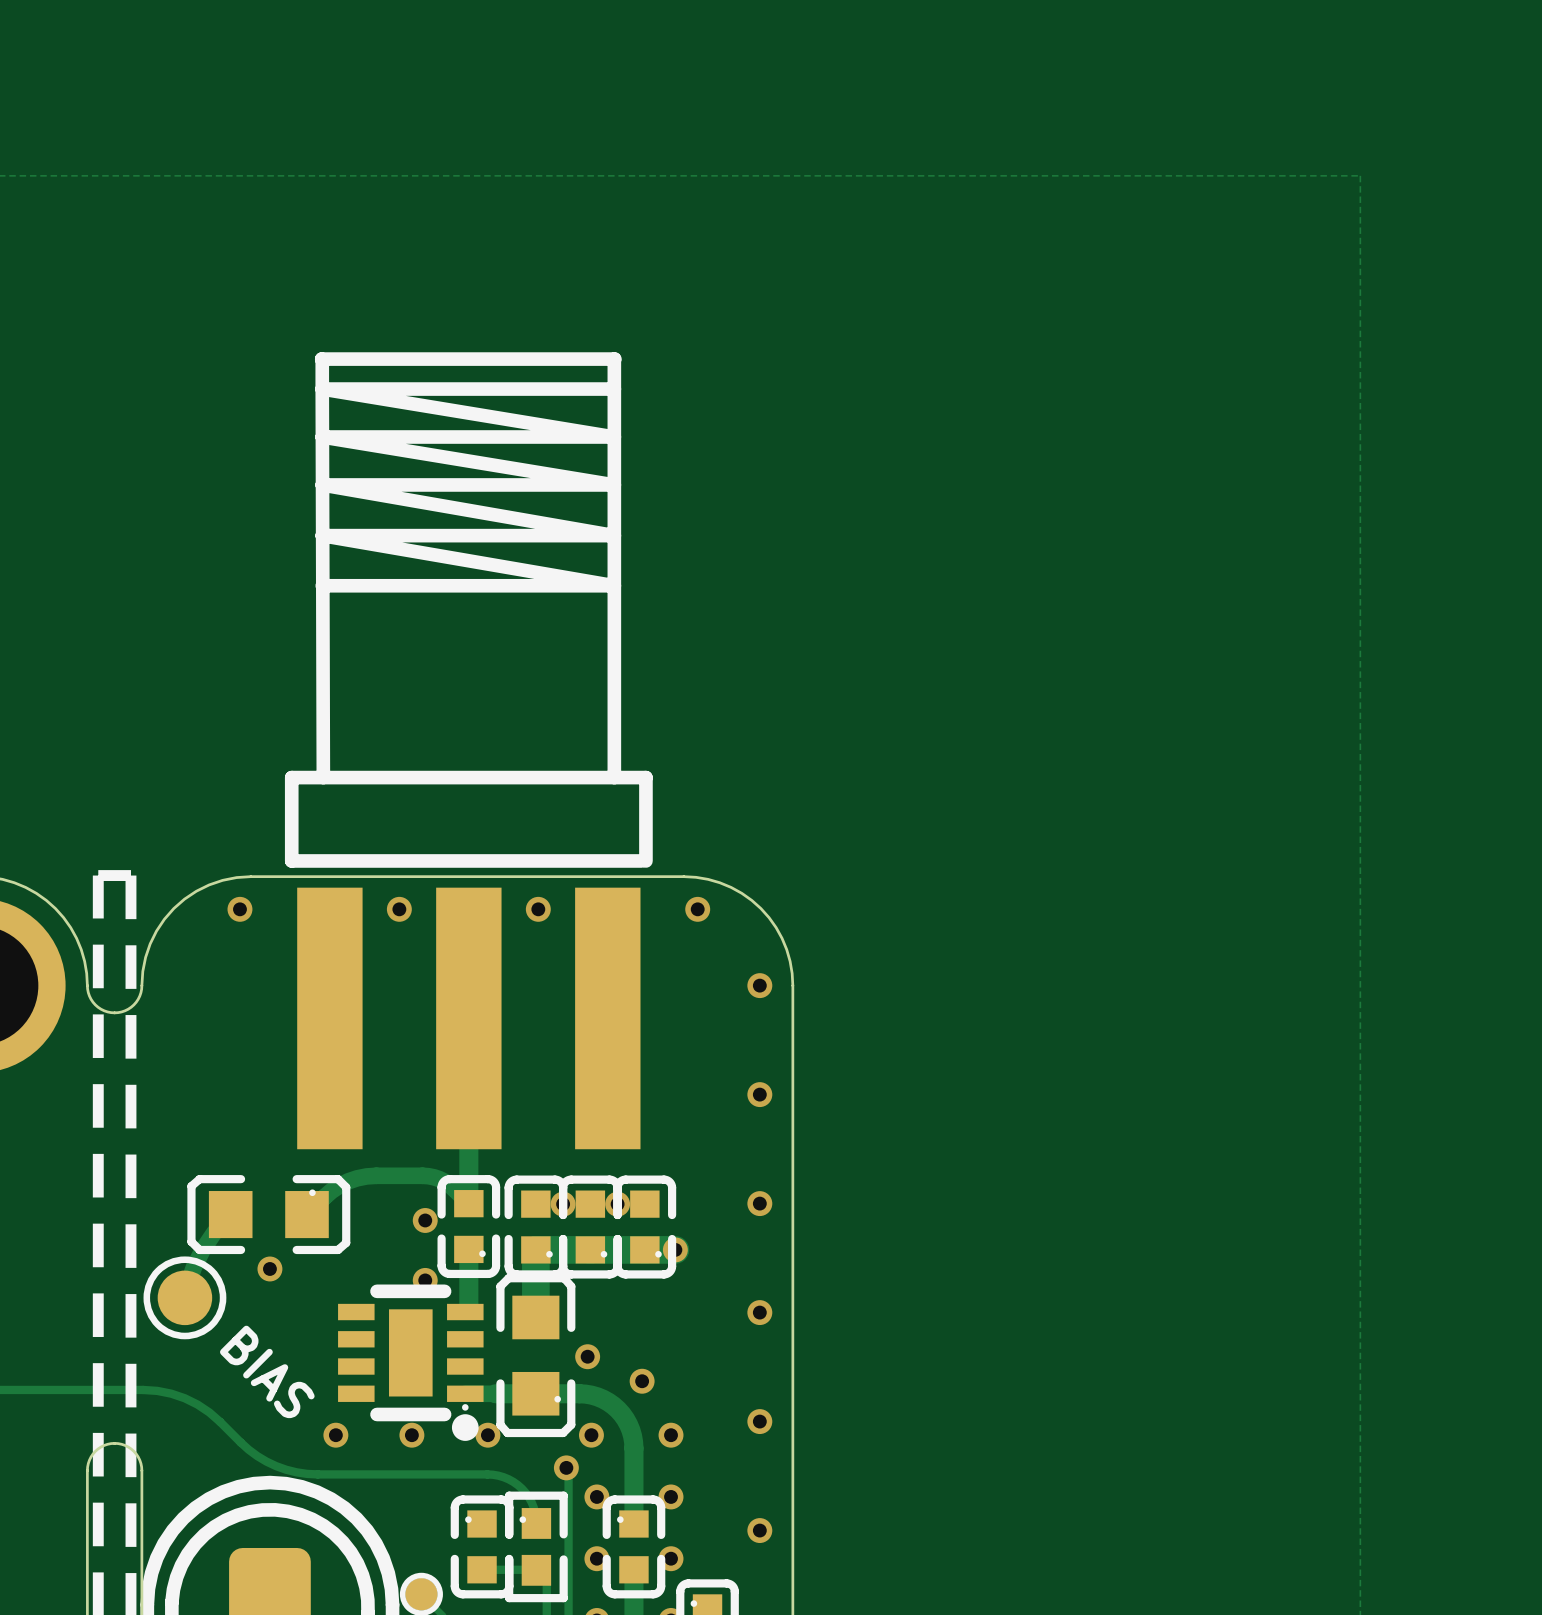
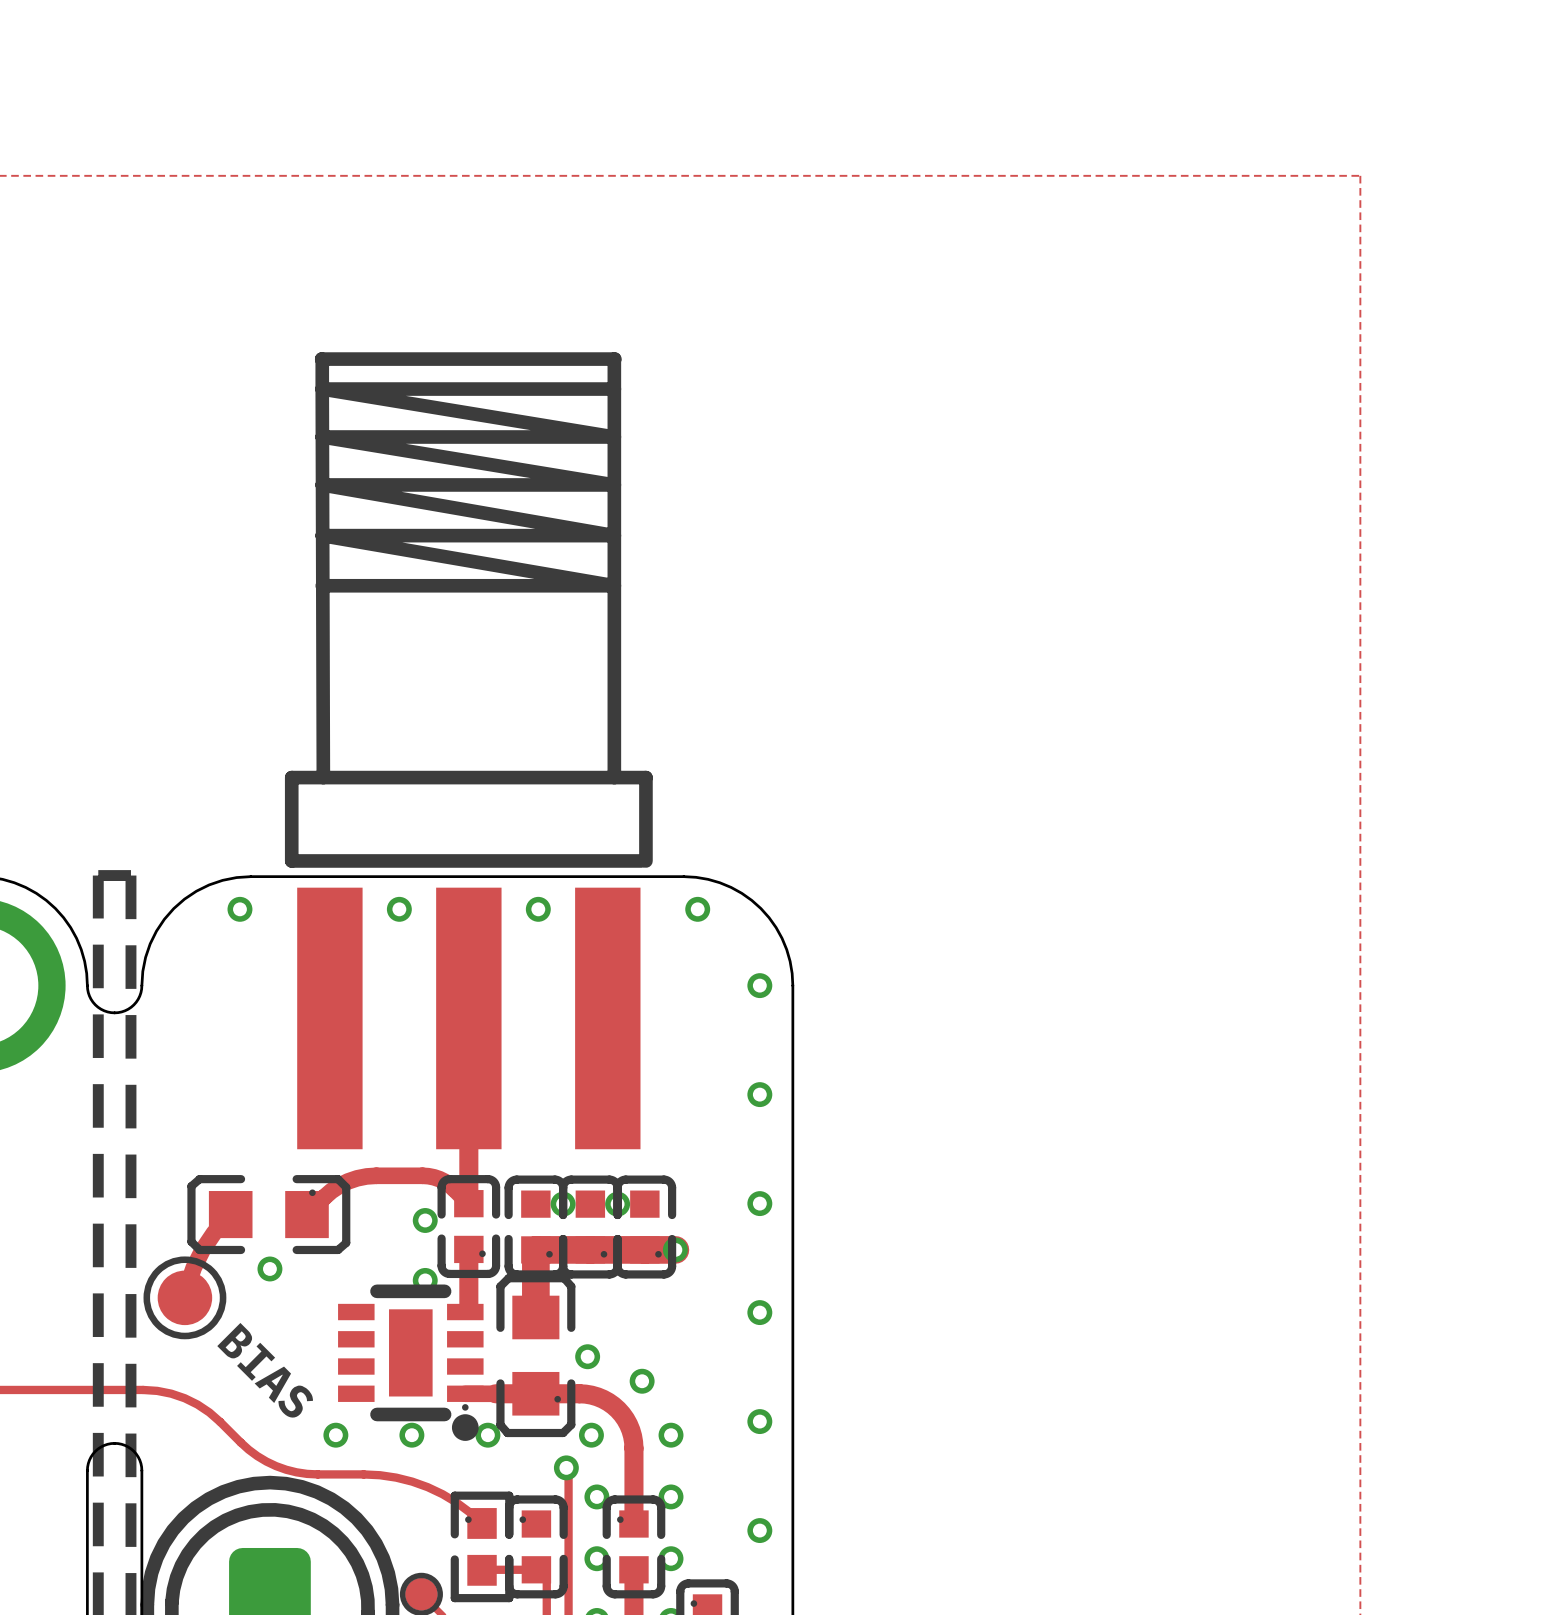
track: (363, 1474) (498, 1475) (513, 1481) (525, 1492) (533, 1507) (536, 1523) -> (363, 1474) (396, 1477) (427, 1487) (456, 1502) (482, 1523)
part footprint: [505, 1491, 568, 1603] -> [505, 1495, 568, 1599]
part footprint: [450, 1495, 514, 1599] -> [450, 1491, 514, 1603]

